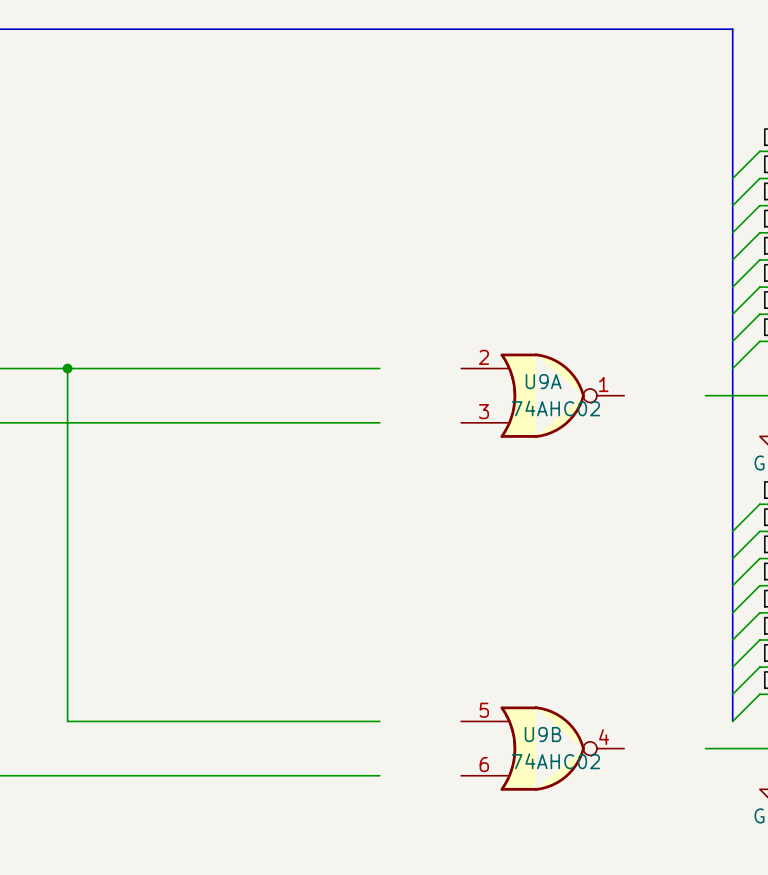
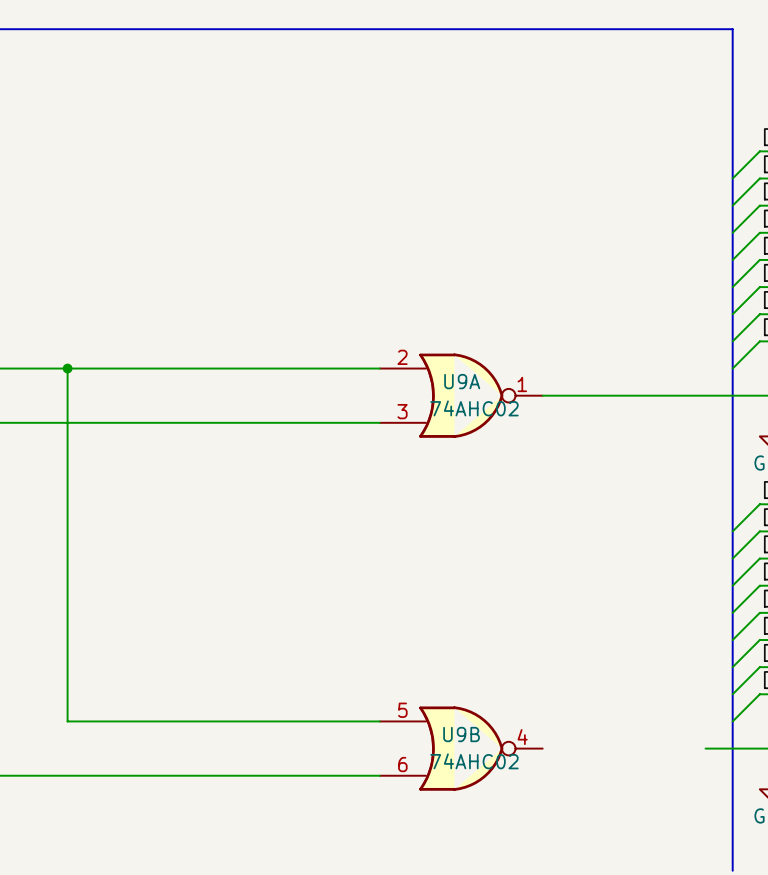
wire: none -> (542, 395) (705, 395)
U9A position: (542, 395) -> (461, 395)
bus: none -> (732, 721) (732, 870)
U9B position: (542, 748) -> (461, 748)

